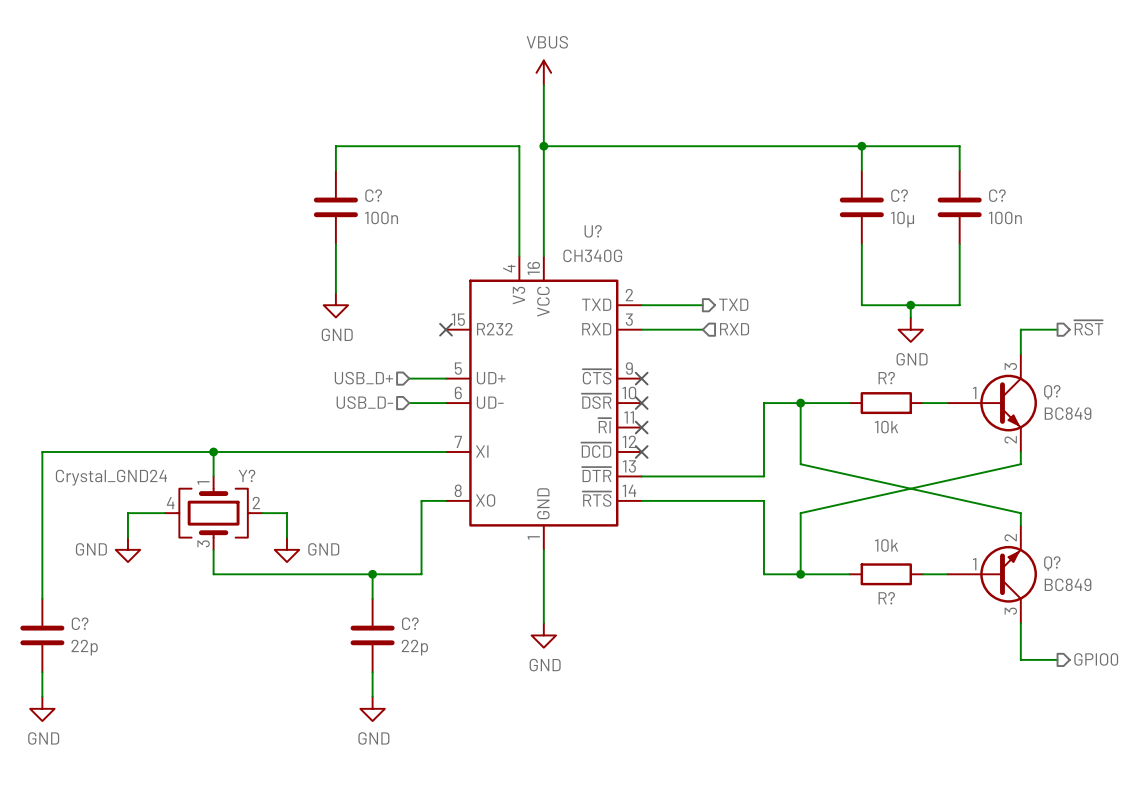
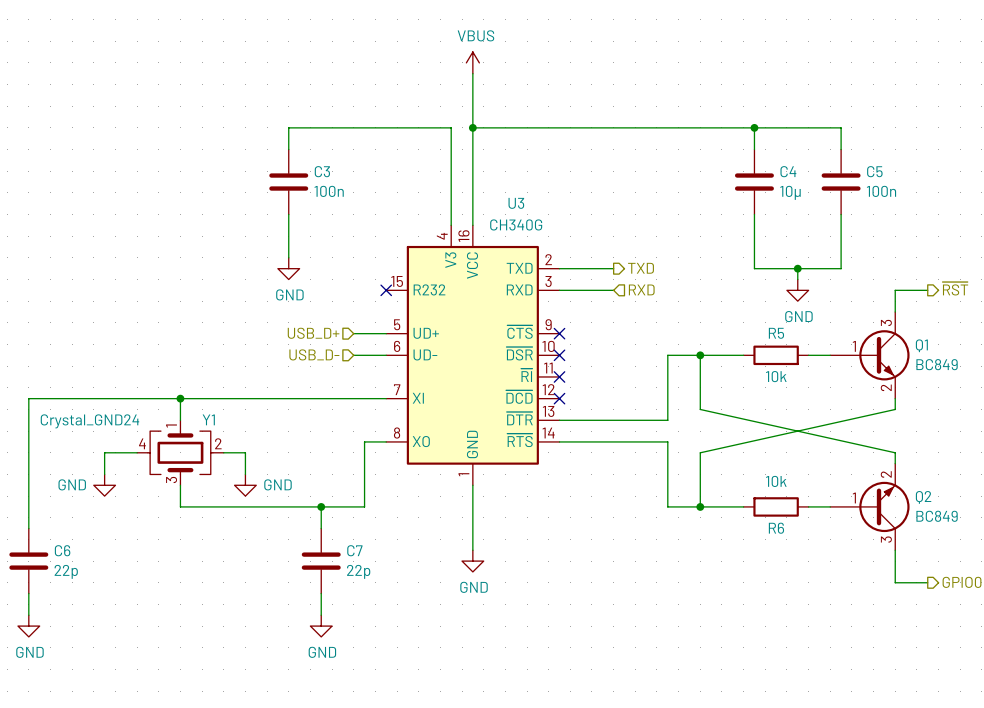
C? name: C? (373, 195) -> C3 (322, 171)
C? name: C? (899, 195) -> C4 (788, 171)
C? name: C? (997, 195) -> C5 (874, 171)
U? name: U? (593, 231) -> U3 (516, 203)
R? name: R? (886, 378) -> R5 (776, 333)
Q? name: Q? (1052, 392) -> Q1 (921, 345)
Y? name: Y? (246, 475) -> Y1 (208, 419)
Q? name: Q? (1052, 563) -> Q2 (923, 497)
R? name: R? (886, 598) -> R6 (776, 528)
C? name: C? (80, 623) -> C6 (62, 550)
C? name: C? (410, 623) -> C7 (354, 550)

